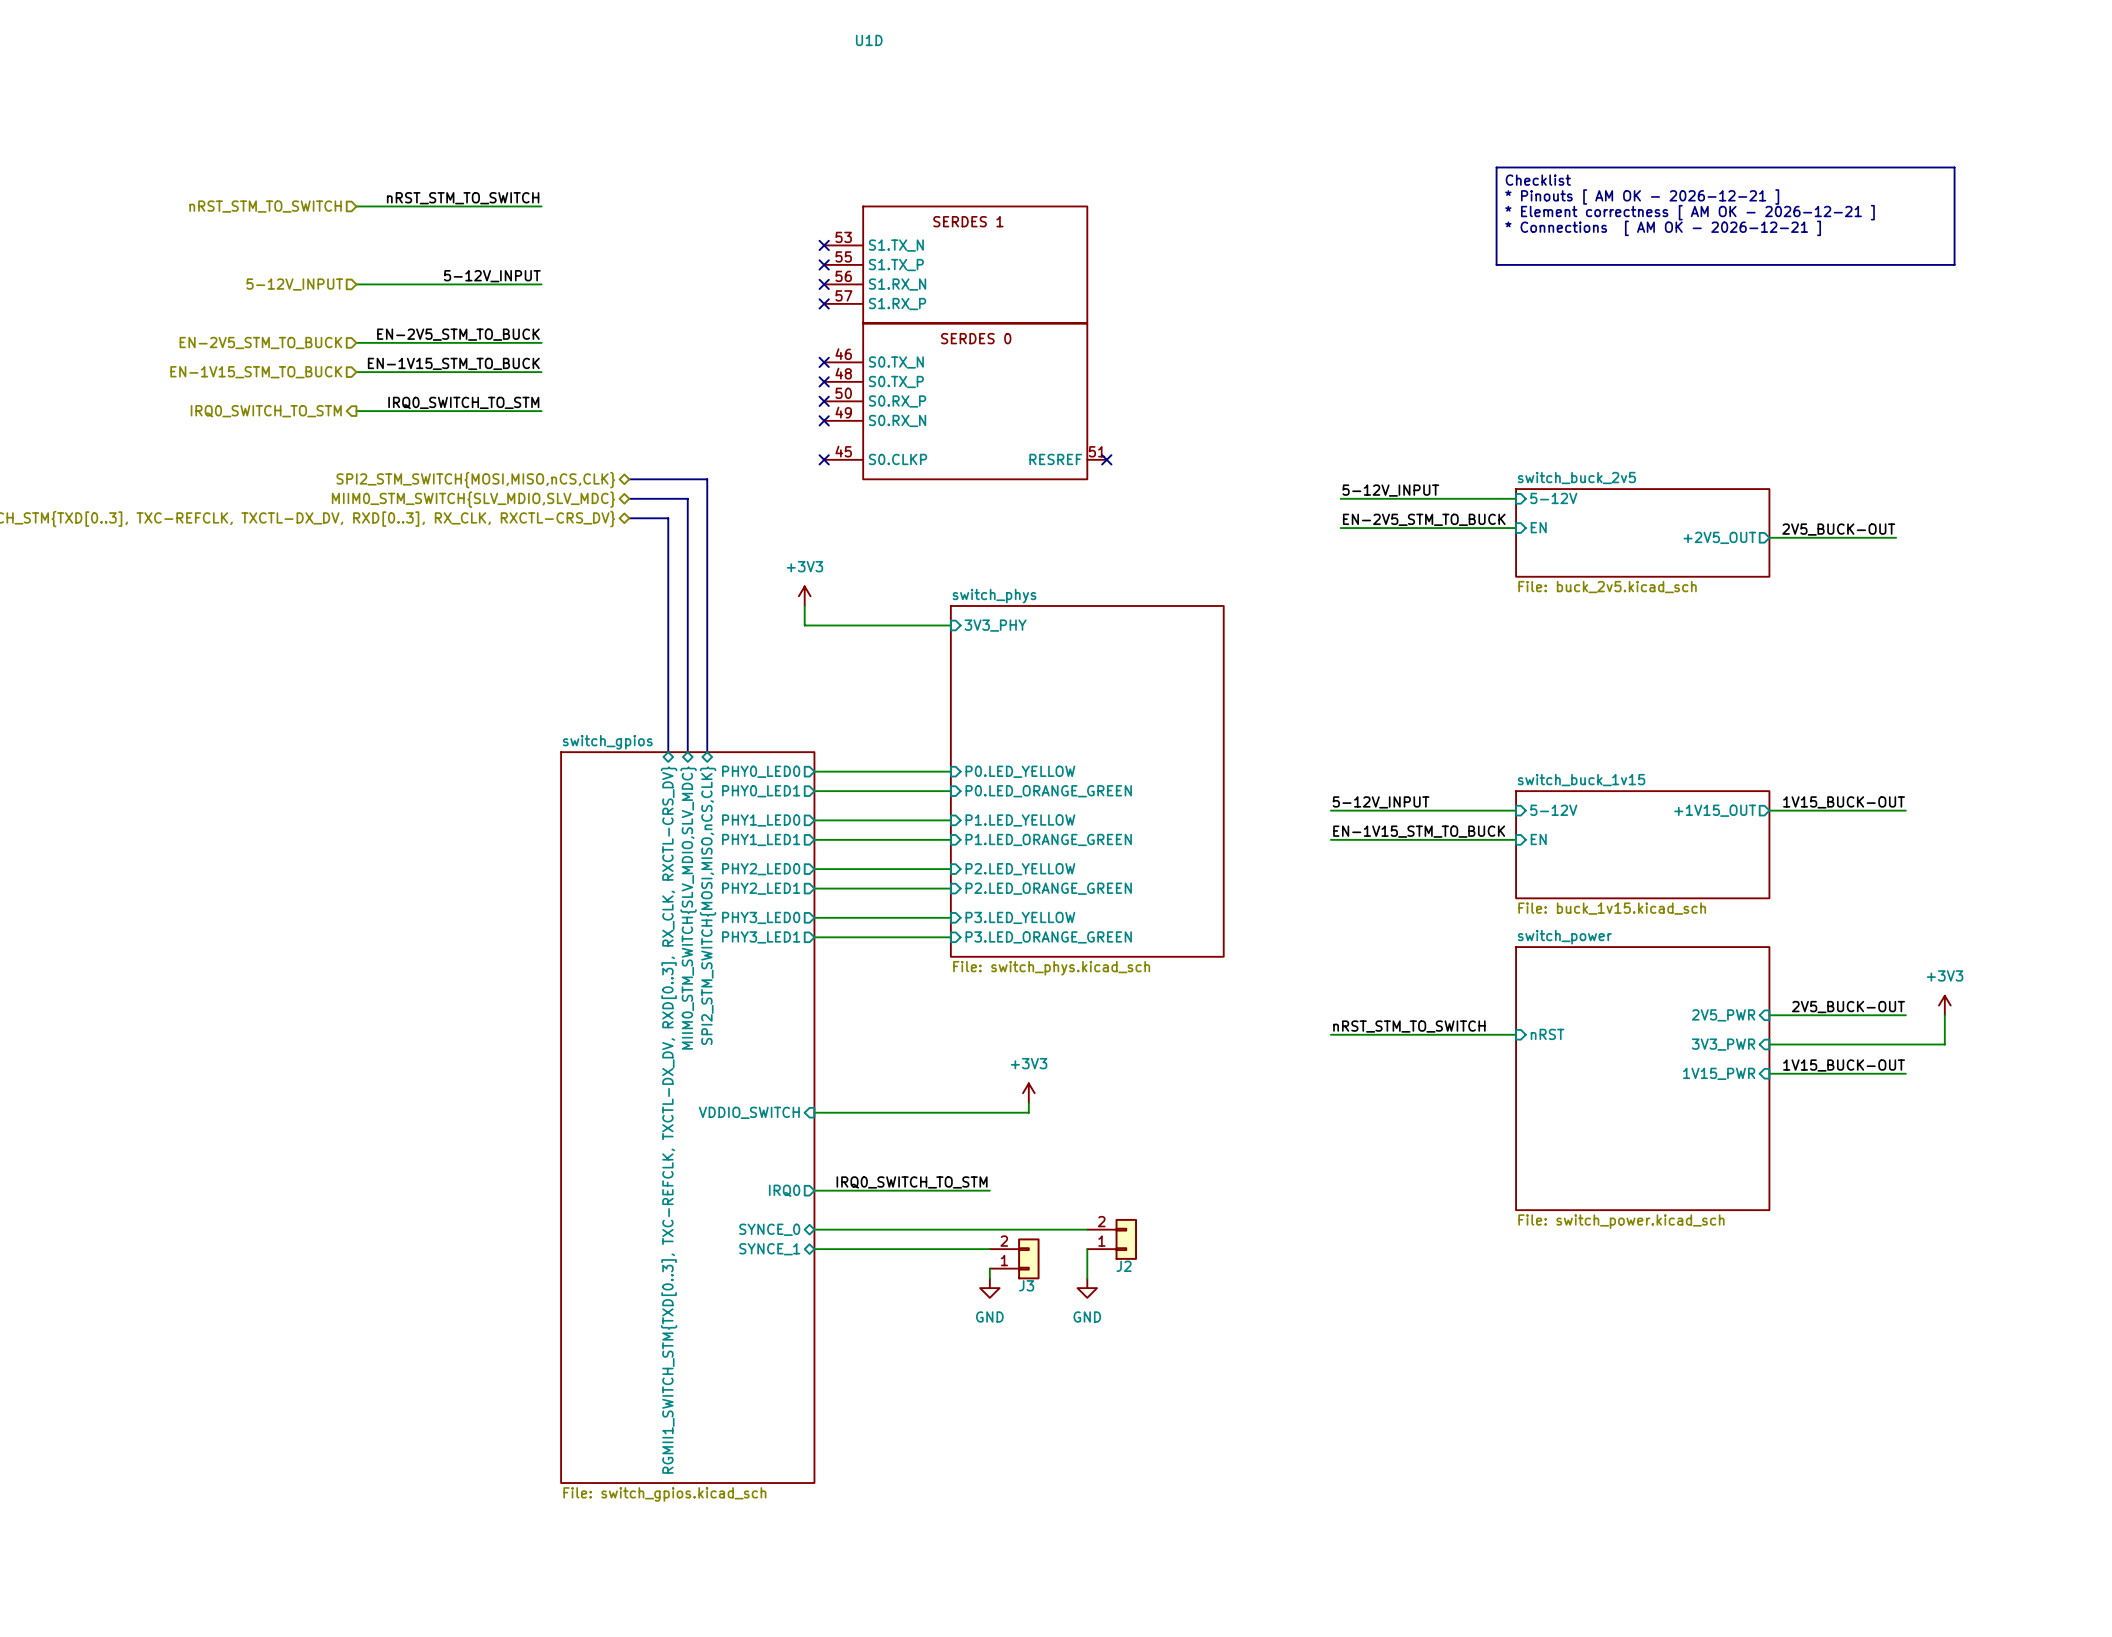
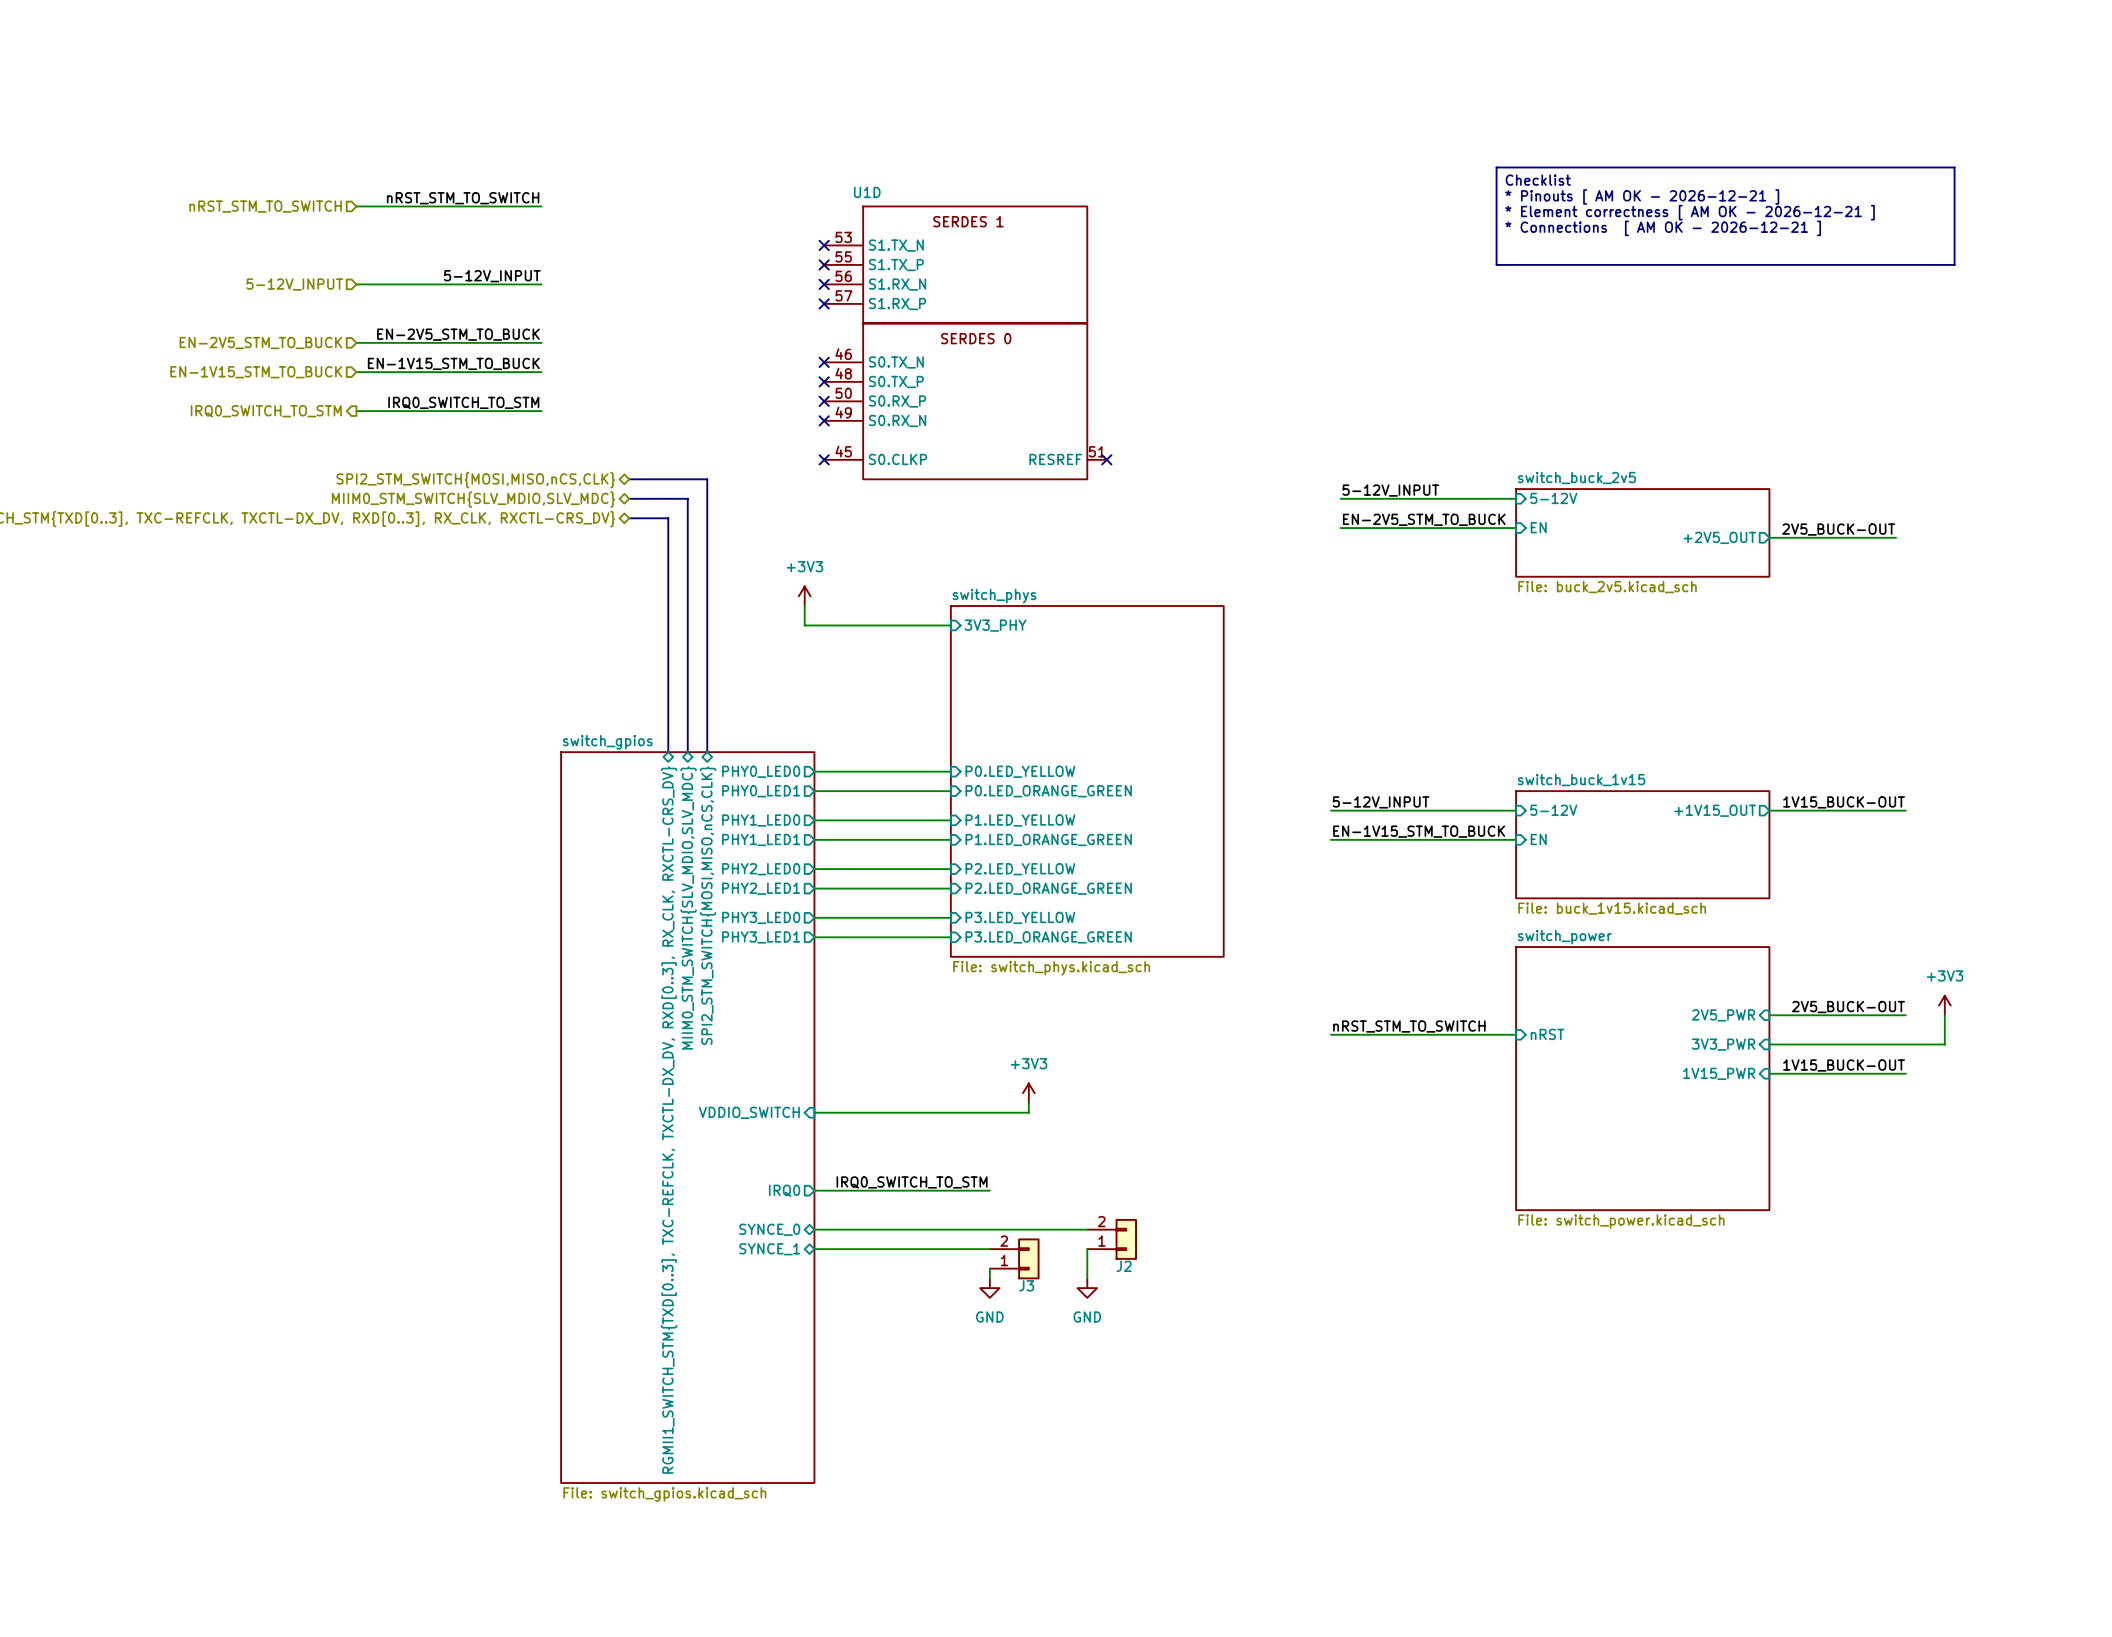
U1D name position: U1D (869, 40) -> U1D (867, 192)

